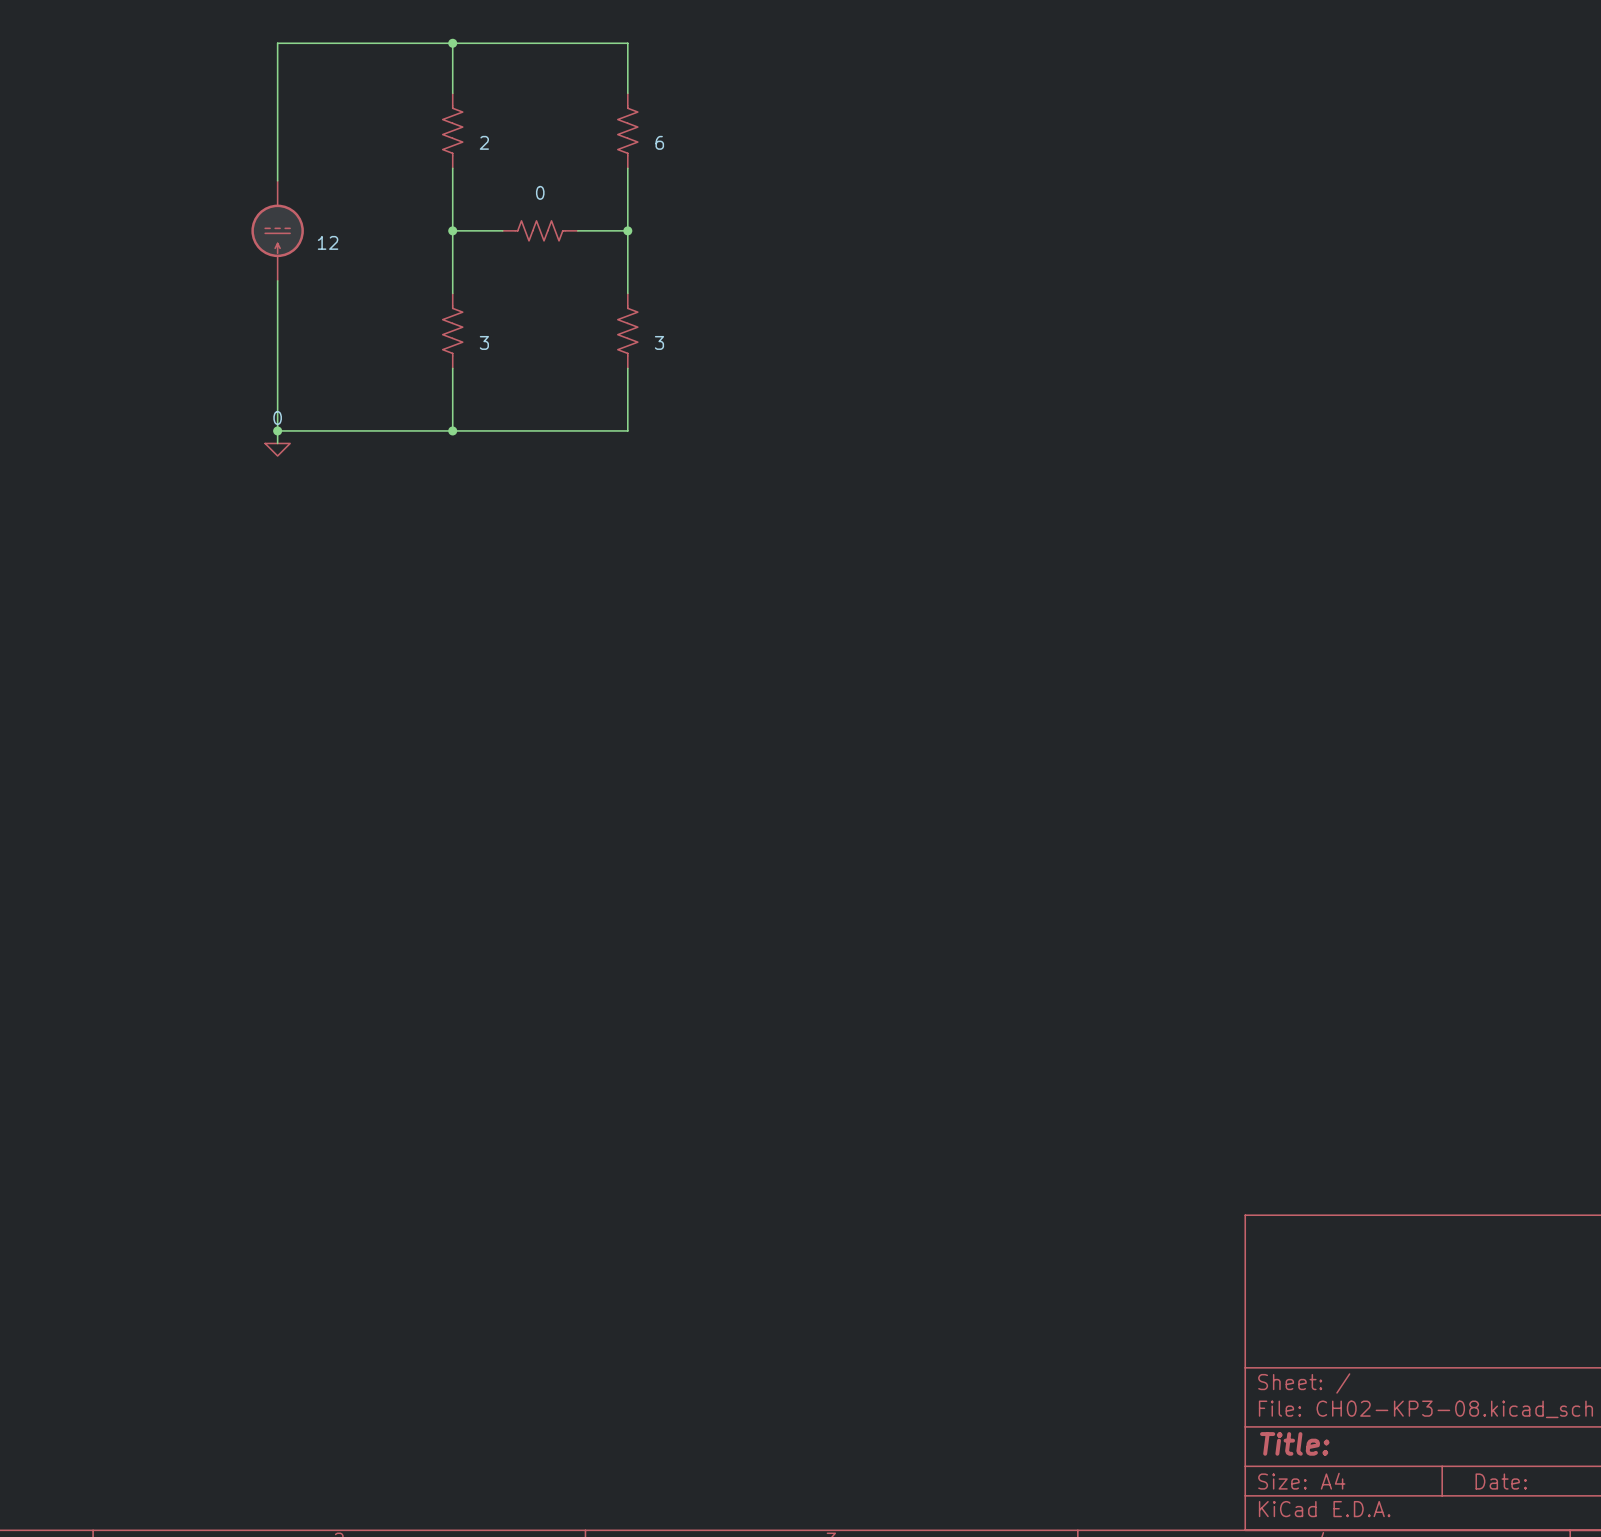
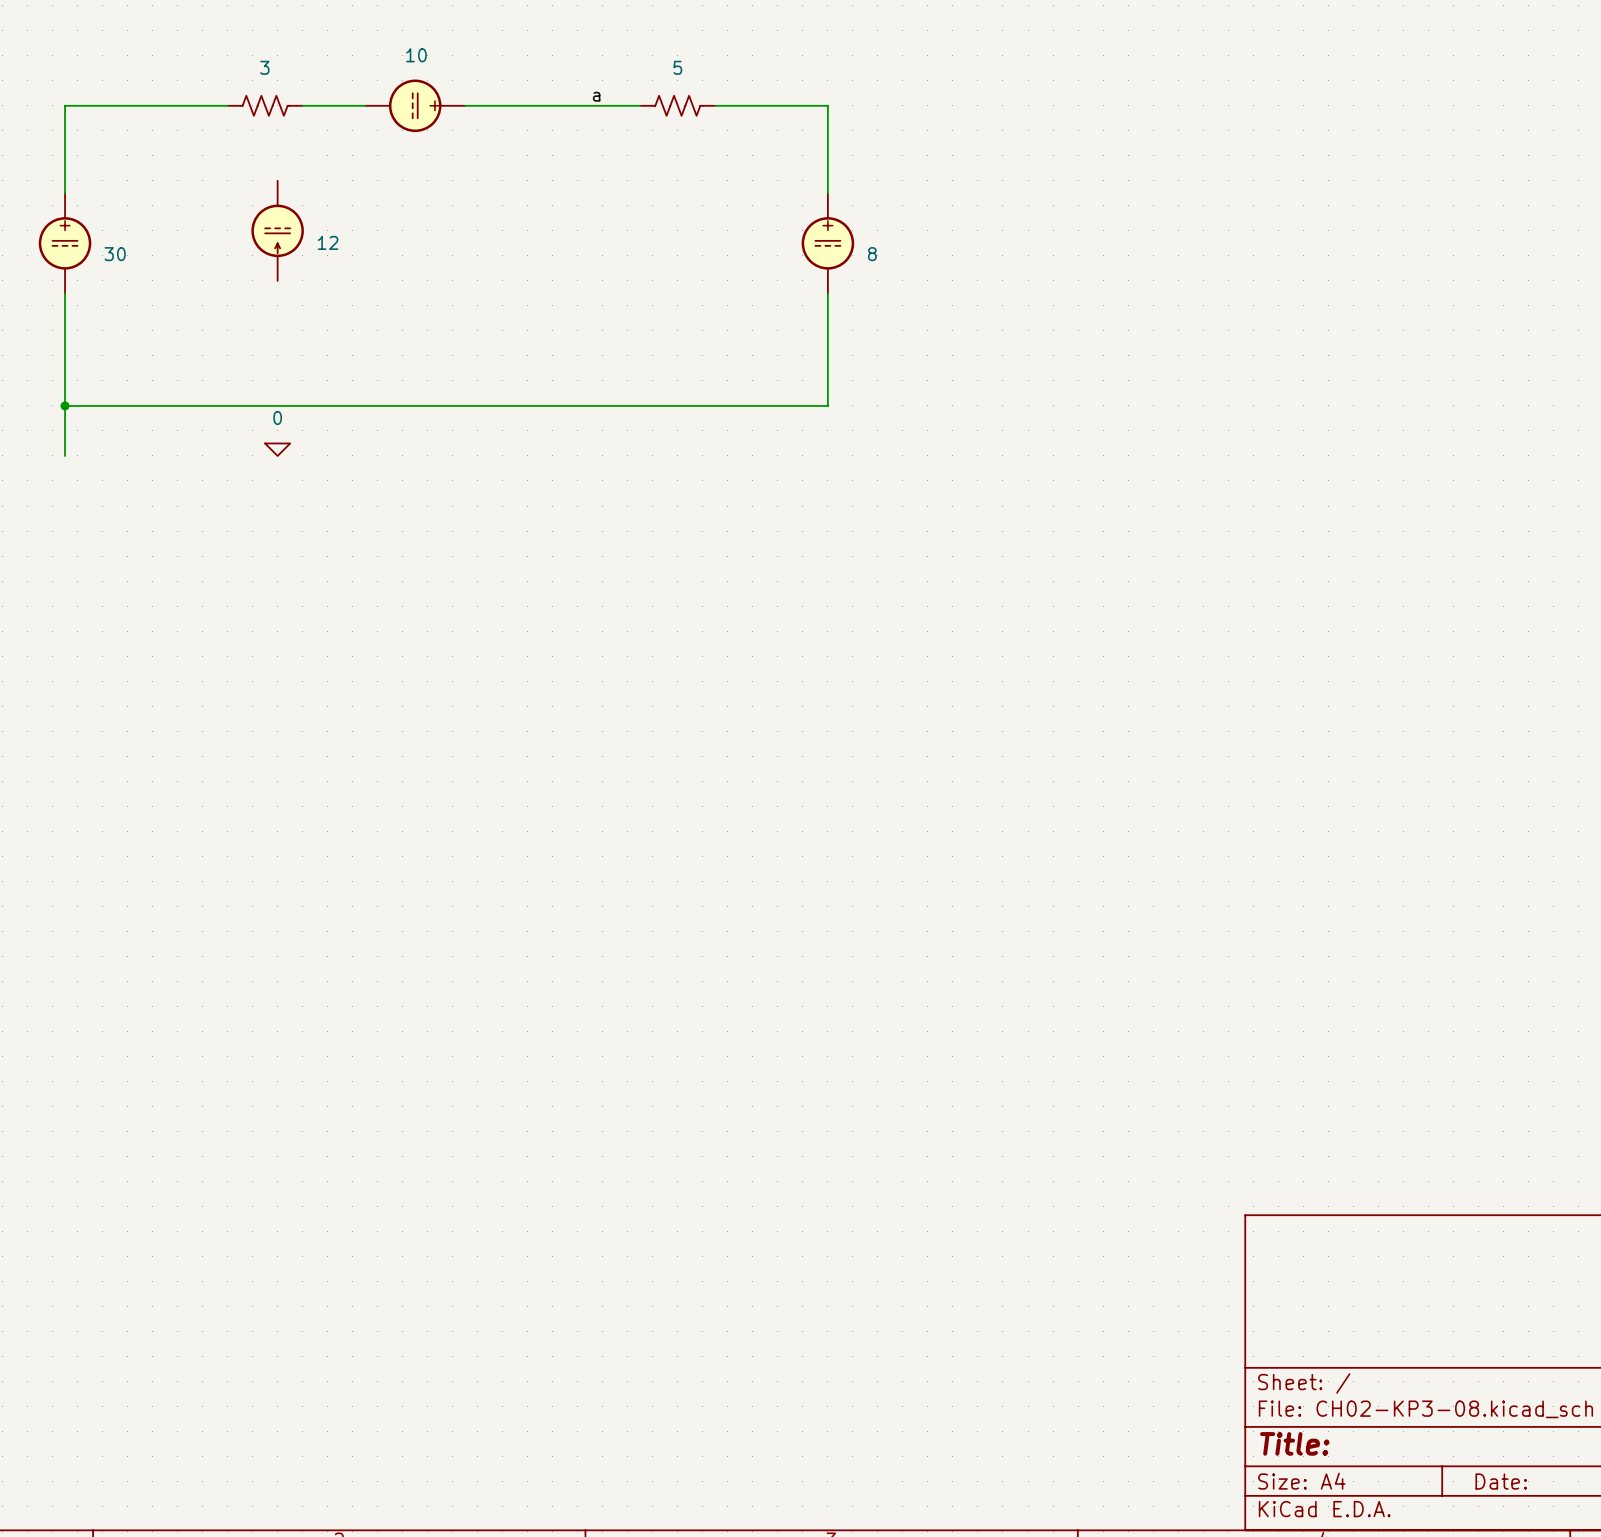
wire: (452, 43) (452, 93) -> none
junction: (452, 43) -> none
wire: (627, 93) (627, 43) (277, 43) (277, 180) -> none
label: none -> a (596, 96)
wire: none -> (227, 105) (65, 105) (65, 193)
part: none -> 3 (265, 105)
wire: none -> (302, 105) (365, 105)
part: none -> 10 (415, 105)
wire: none -> (465, 105) (640, 105)
part: none -> 5 (677, 105)
wire: none -> (715, 105) (827, 105) (827, 193)
part: 2 (452, 130) -> none
part: 6 (627, 130) -> none
wire: (452, 168) (452, 293) -> none
wire: (627, 168) (627, 293) -> none
wire: (452, 230) (502, 230) -> none
junction: (452, 230) -> none
part: 0 (540, 230) -> none
wire: (577, 230) (627, 230) -> none
junction: (627, 230) -> none
part: none -> 30 (65, 243)
part: none -> 8 (827, 243)
wire: (277, 280) (277, 443) -> (65, 293) (65, 455)
wire: none -> (827, 293) (827, 405) (65, 405)
part: 3 (452, 330) -> none
part: 3 (627, 330) -> none
wire: (452, 368) (452, 430) -> none
wire: (627, 368) (627, 430) (277, 430) -> none
junction: none -> (65, 405)
junction: (277, 430) -> none
junction: (452, 430) -> none

